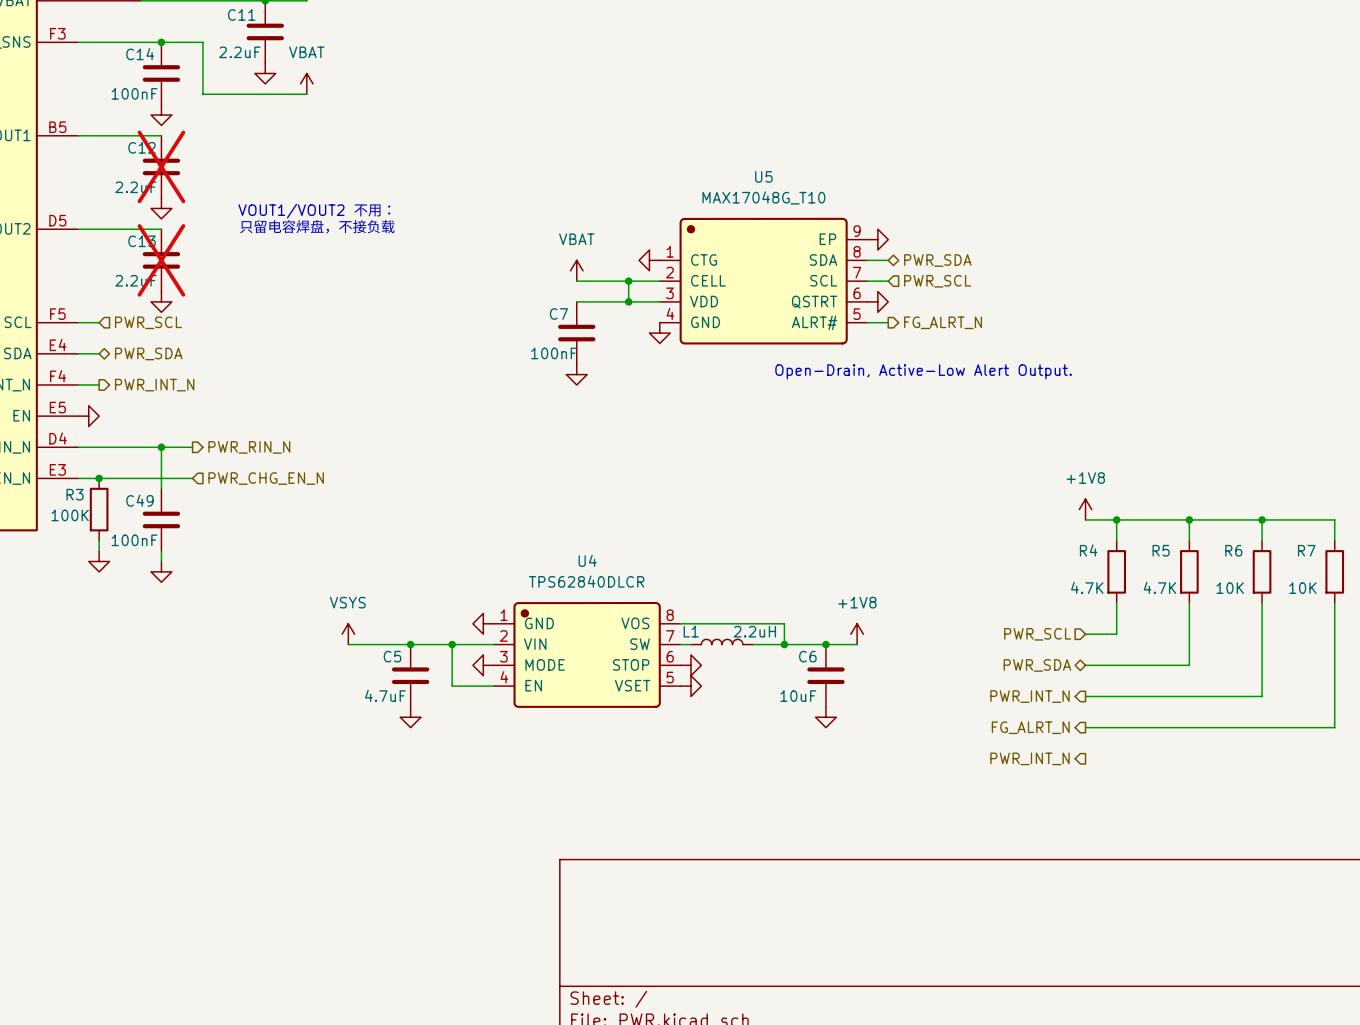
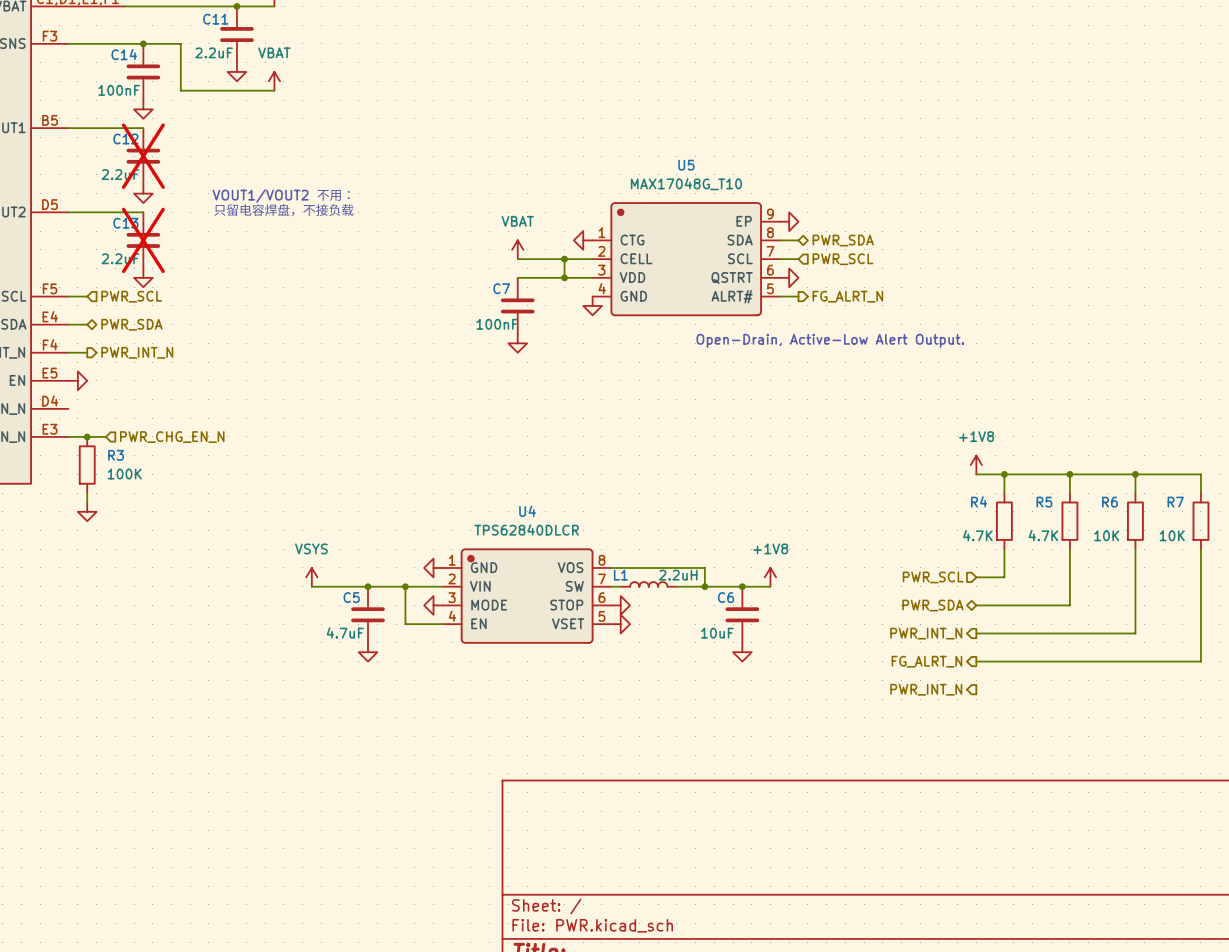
wire: (78, 447) (192, 447) -> none
wire: (161, 447) (161, 488) -> none
junction: (161, 447) -> none
hierarchical label: PWR_RIN_N (249, 447) -> none
wire: (119, 478) (192, 478) -> none
hierarchical label position: PWR_CHG_EN_N (266, 478) -> PWR_CHG_EN_N (172, 437)
R3 name position: R3 (75, 494) -> R3 (116, 455)
R3 value position: 100K (70, 515) -> 100K (124, 474)
C49: 100nF (161, 519) -> none
wire: (161, 551) (161, 561) -> none
power symbol: (161, 571) -> none

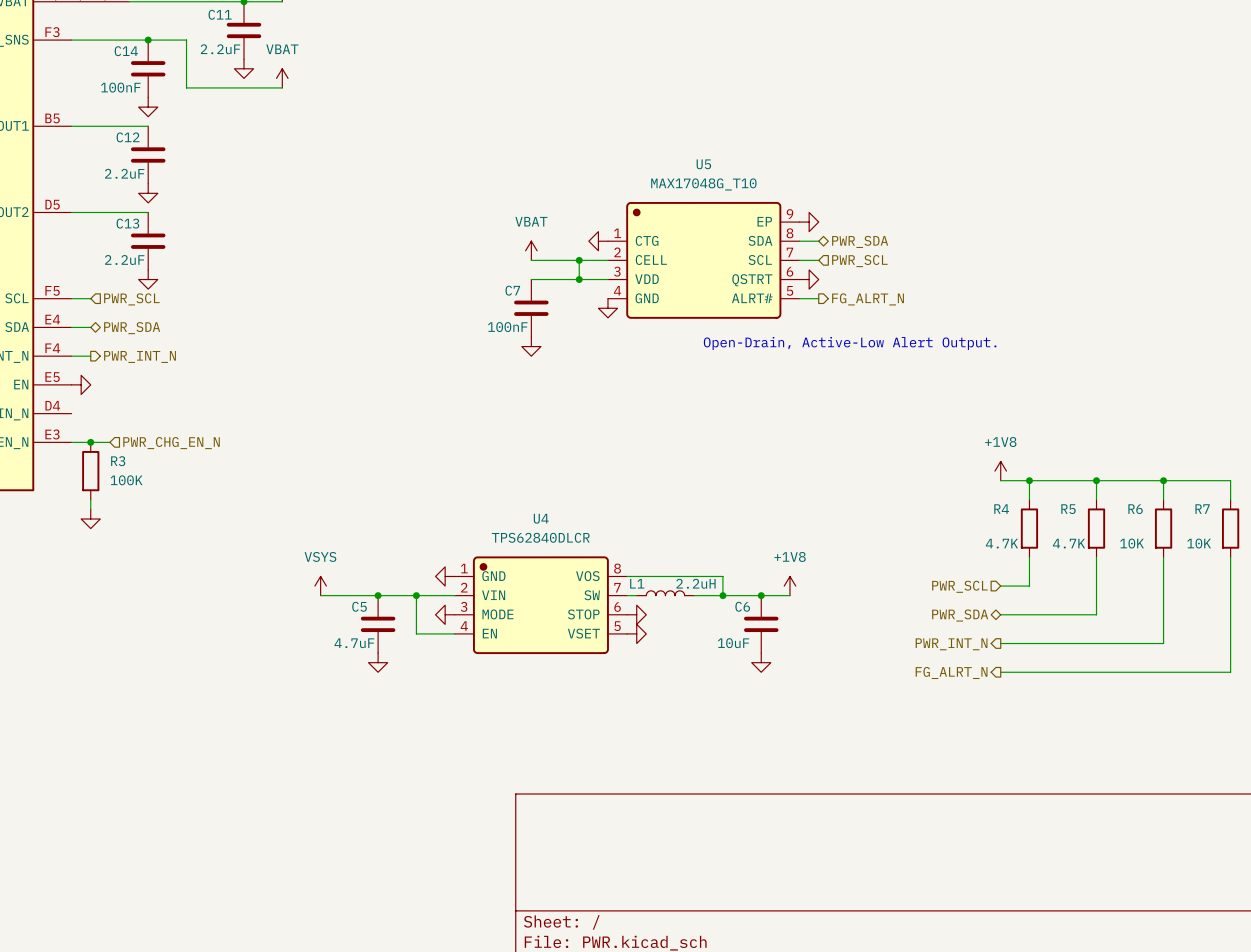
C12 do-not-place cross: (143, 156) -> none
text: VOUT1/VOUT2 不用： (281, 196) -> none
text: 只留电容焊盘，不接负载 (283, 210) -> none
C13 do-not-place cross: (143, 240) -> none
hierarchical label: PWR_INT_N (926, 689) -> none

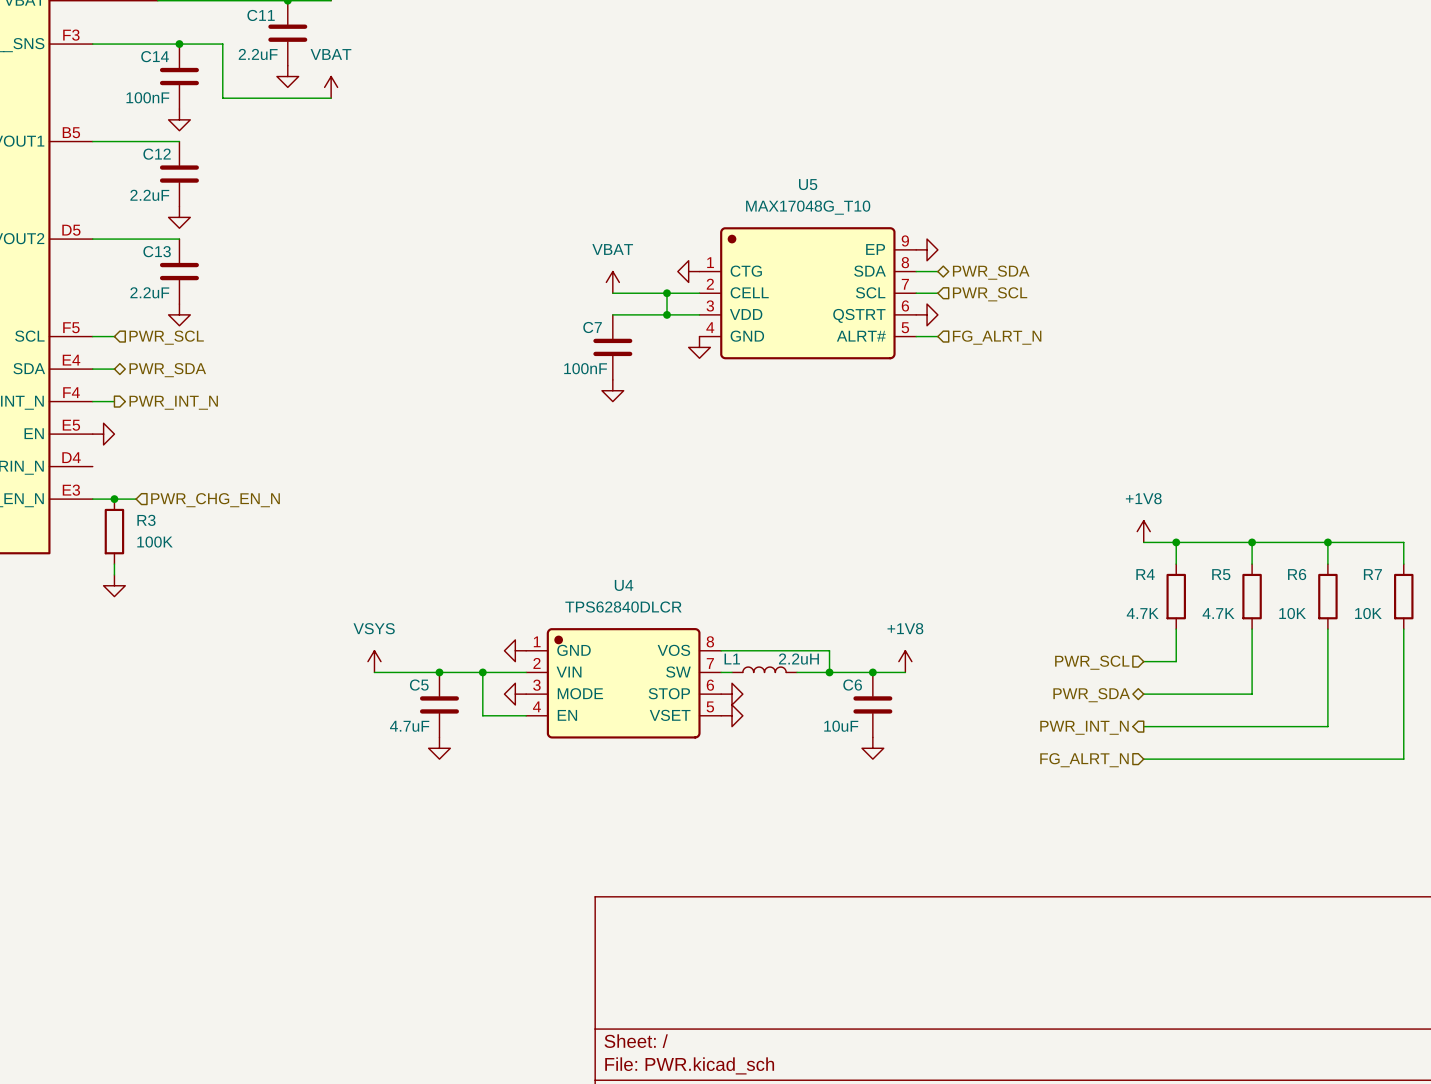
hierarchical label shape: output (868, 299) -> input (997, 337)
text: Open-Drain, Active-Low Alert Output. (850, 343) -> none
hierarchical label shape: output (951, 672) -> input (1084, 760)

